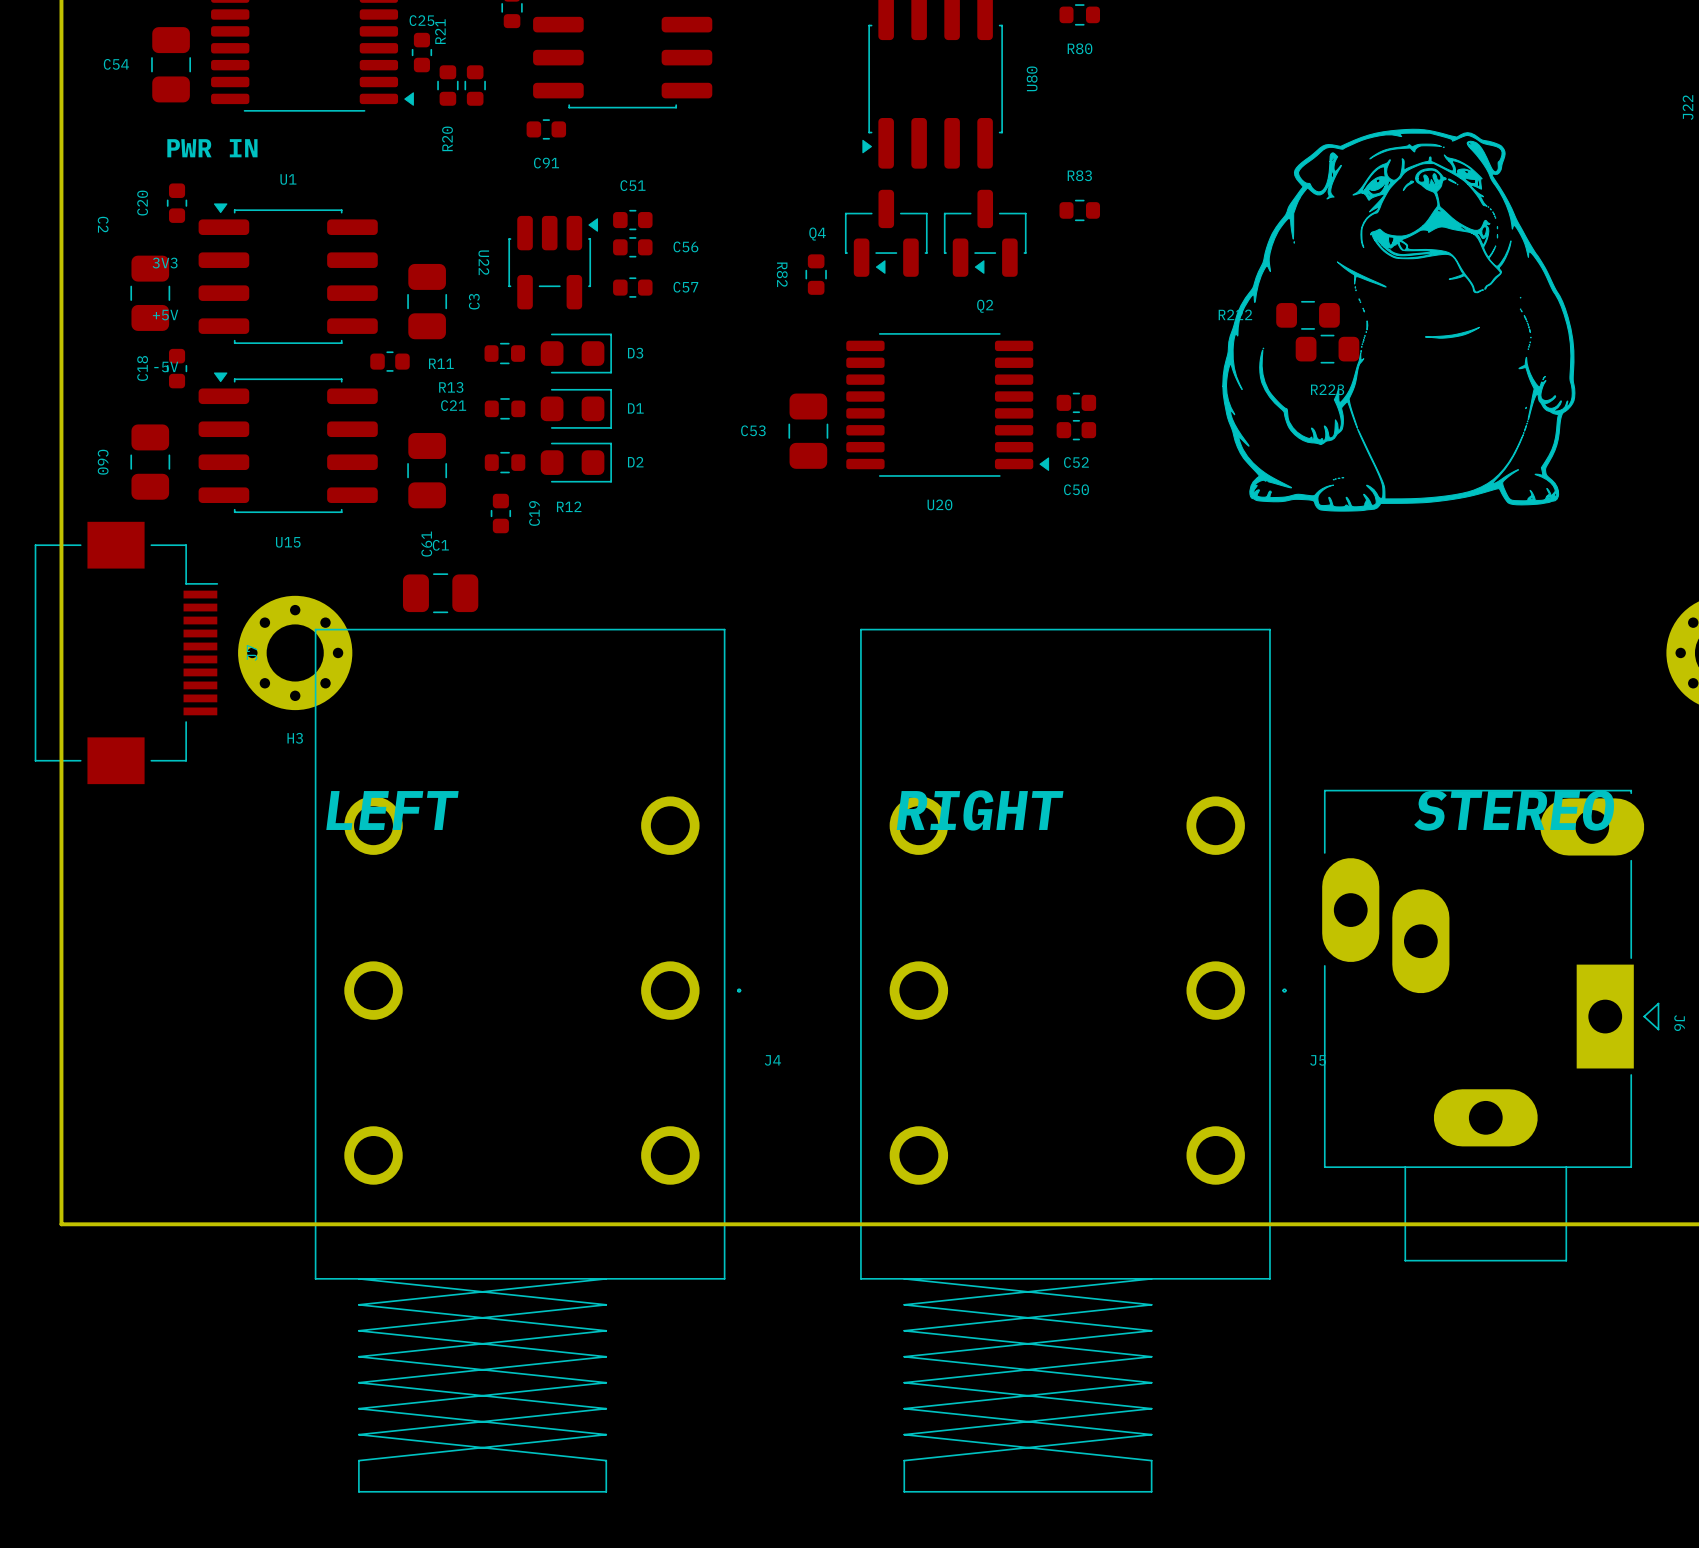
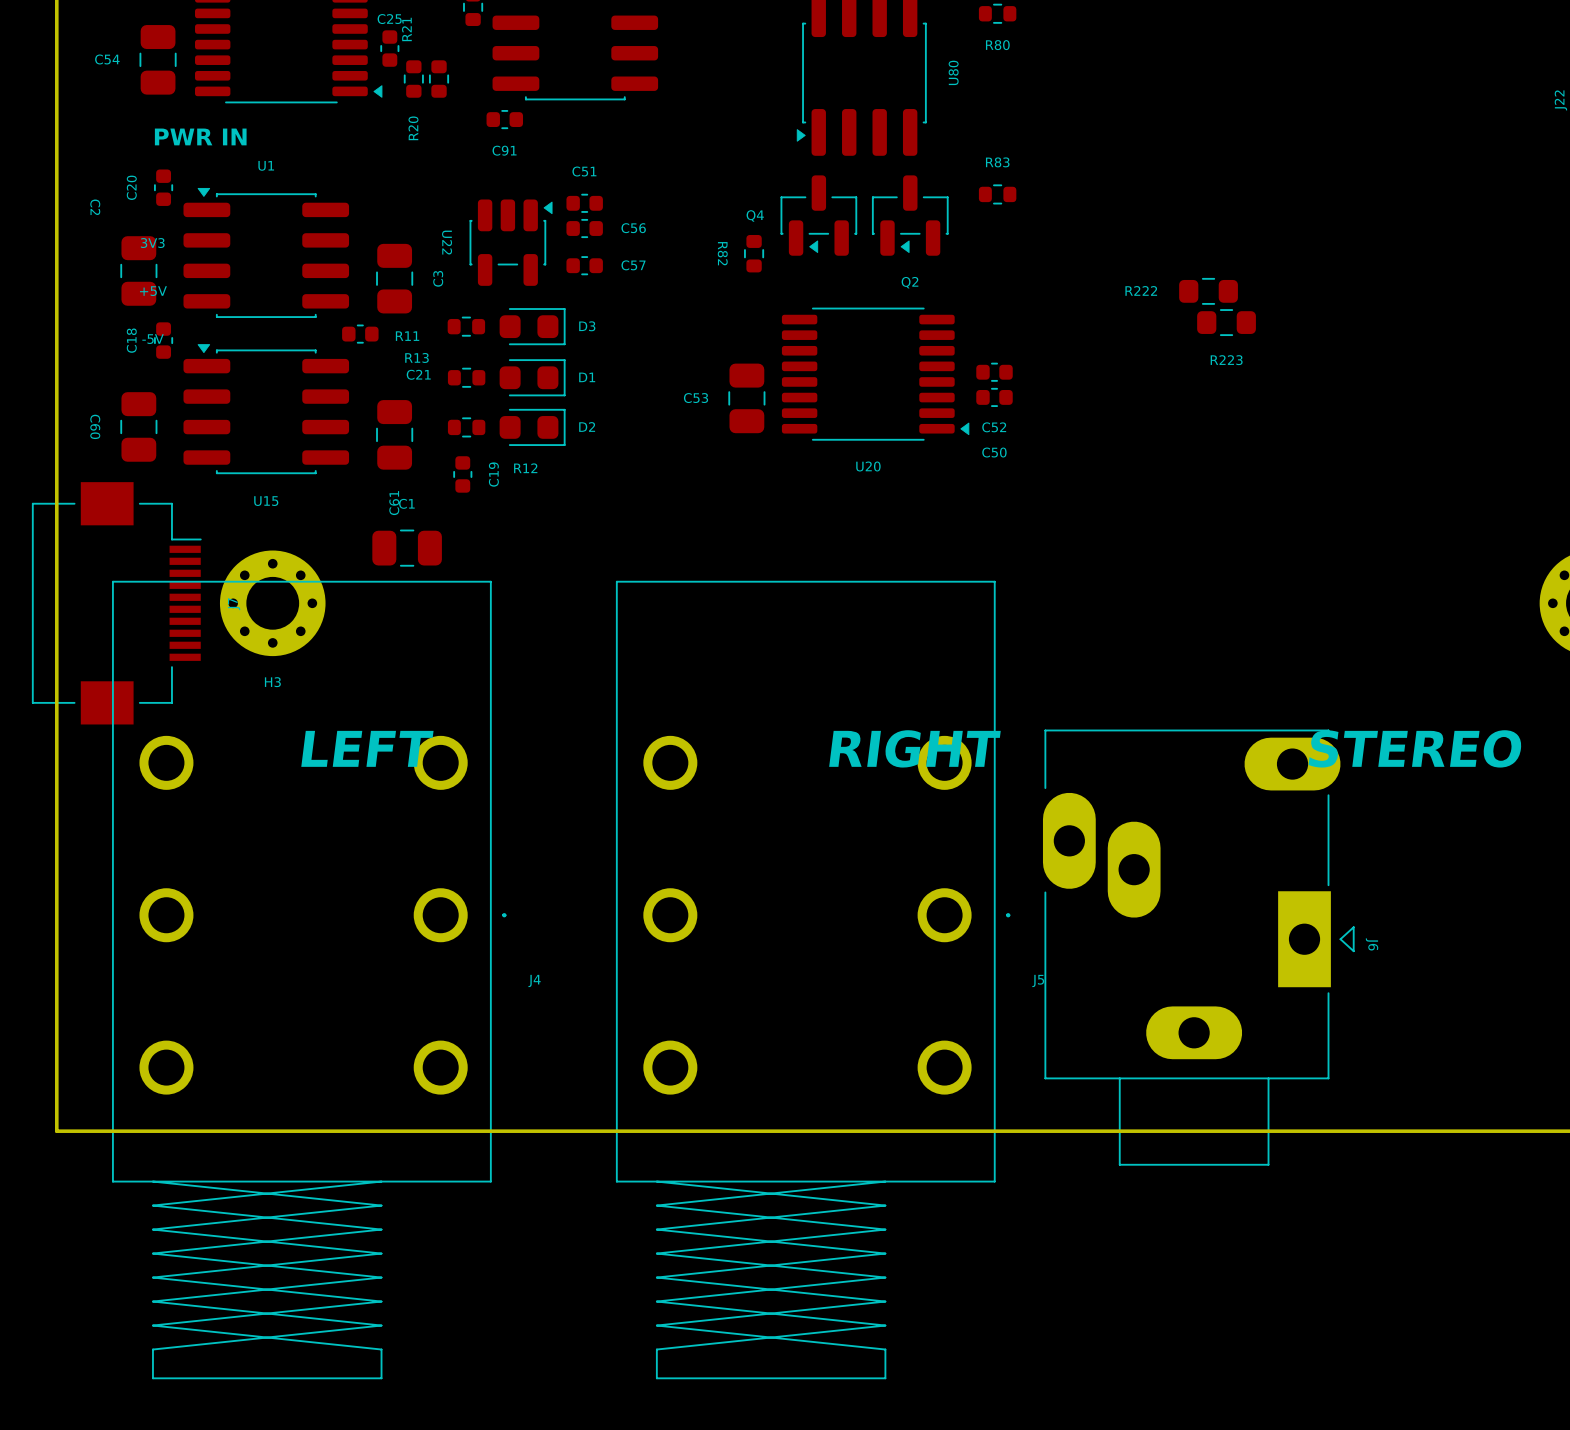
drawing: [1222, 128, 1576, 512] -> none
J6 position: (1490, 1025) -> (1198, 947)
J4 position: (528, 1060) -> (309, 980)
J5 position: (1073, 1060) -> (813, 980)

